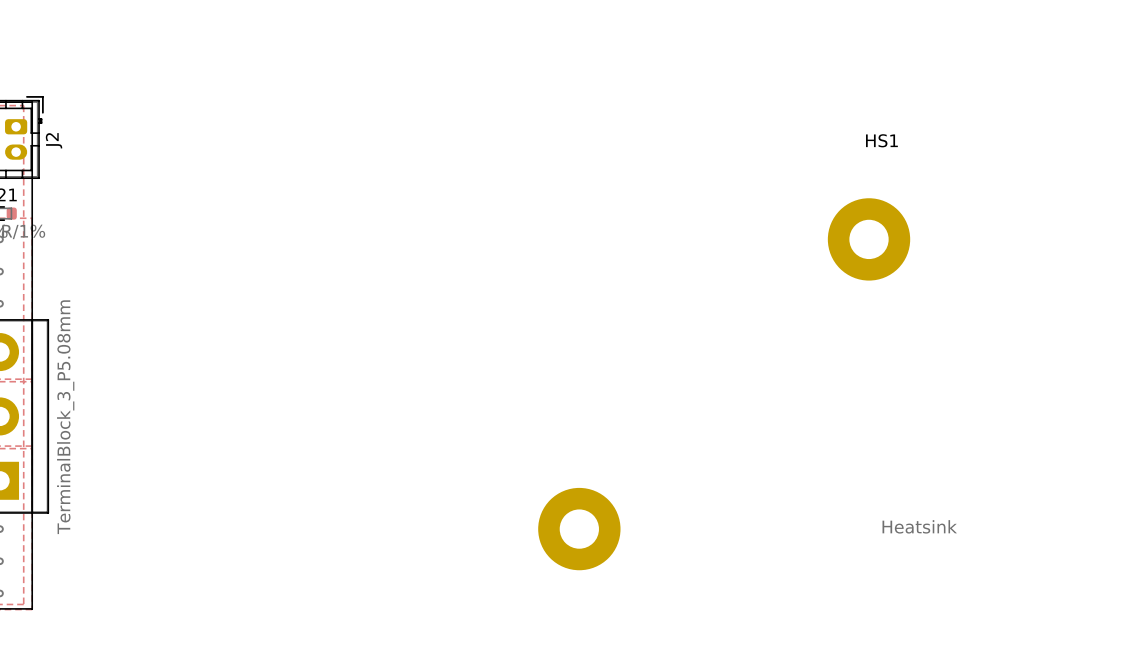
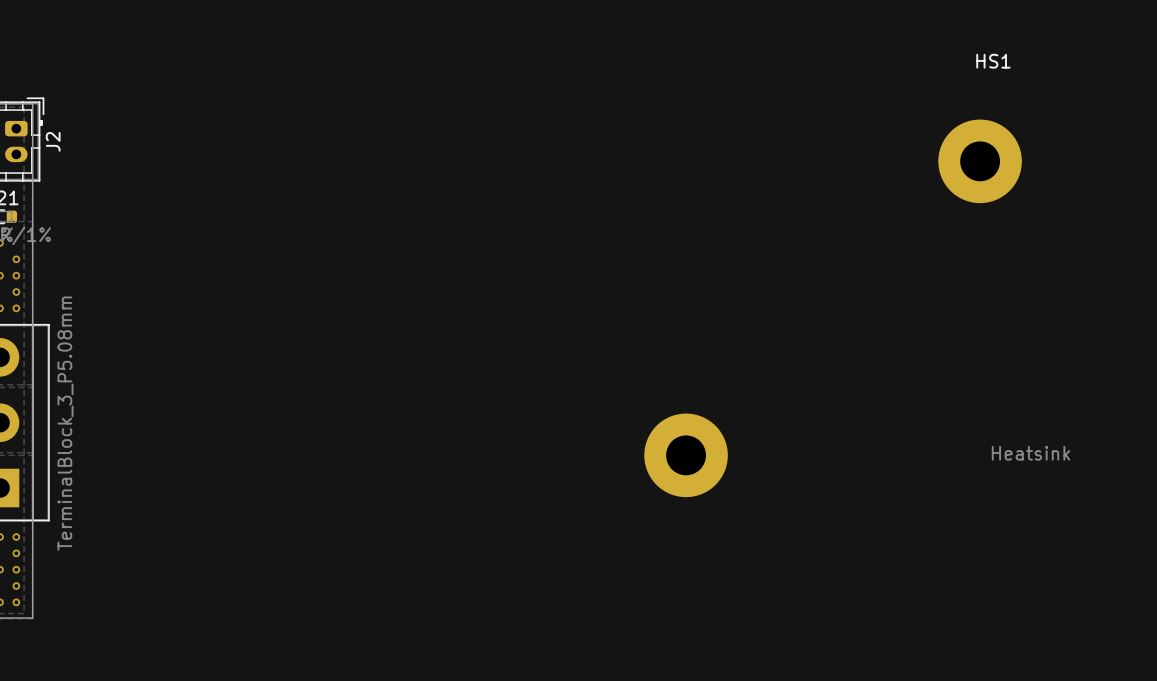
via: none -> (16, 259)
via: none -> (16, 275)
via: none -> (16, 292)
via: none -> (16, 308)
HS1 position: (724, 384) -> (833, 308)
via: none -> (16, 537)
via: none -> (16, 553)
via: none -> (16, 569)
via: none -> (16, 586)
via: none -> (16, 602)

